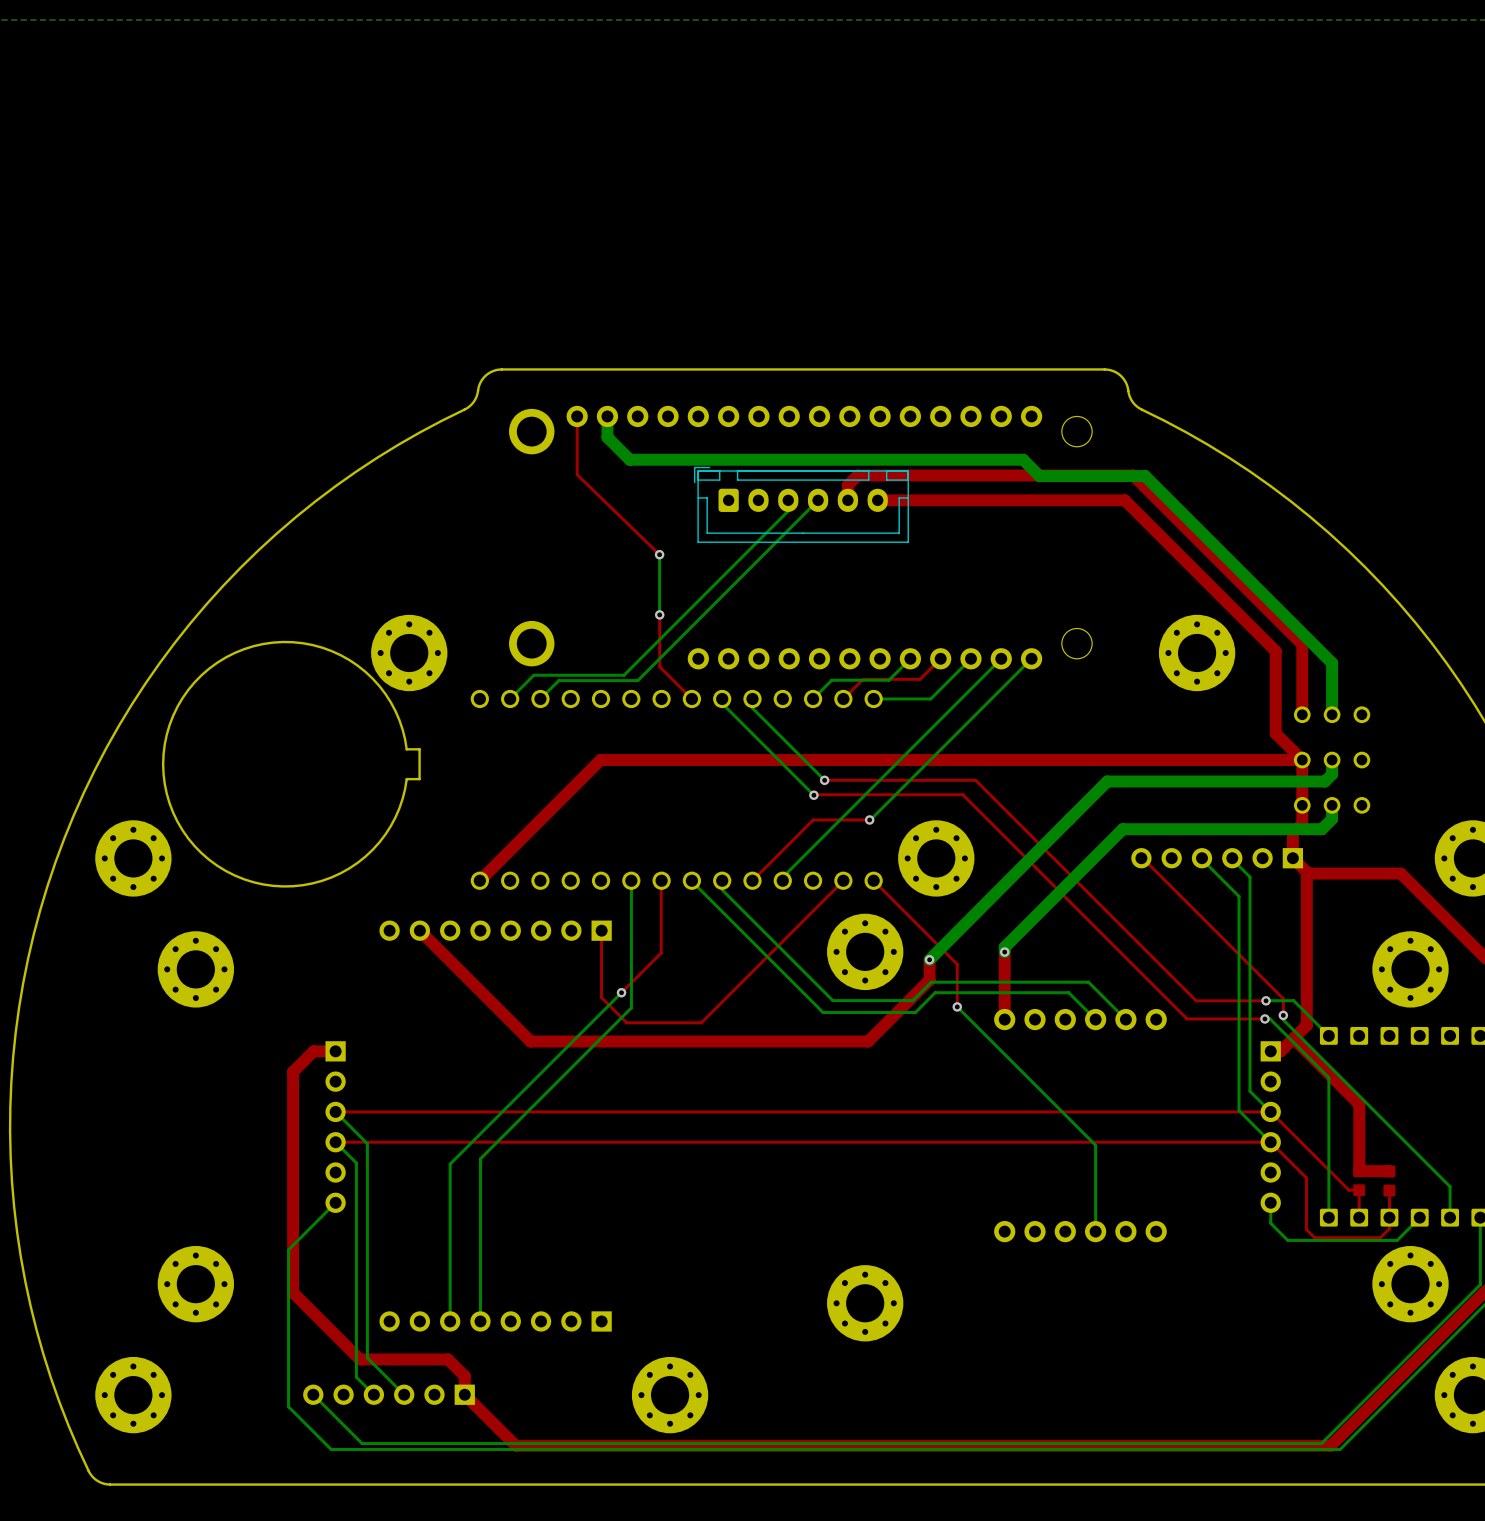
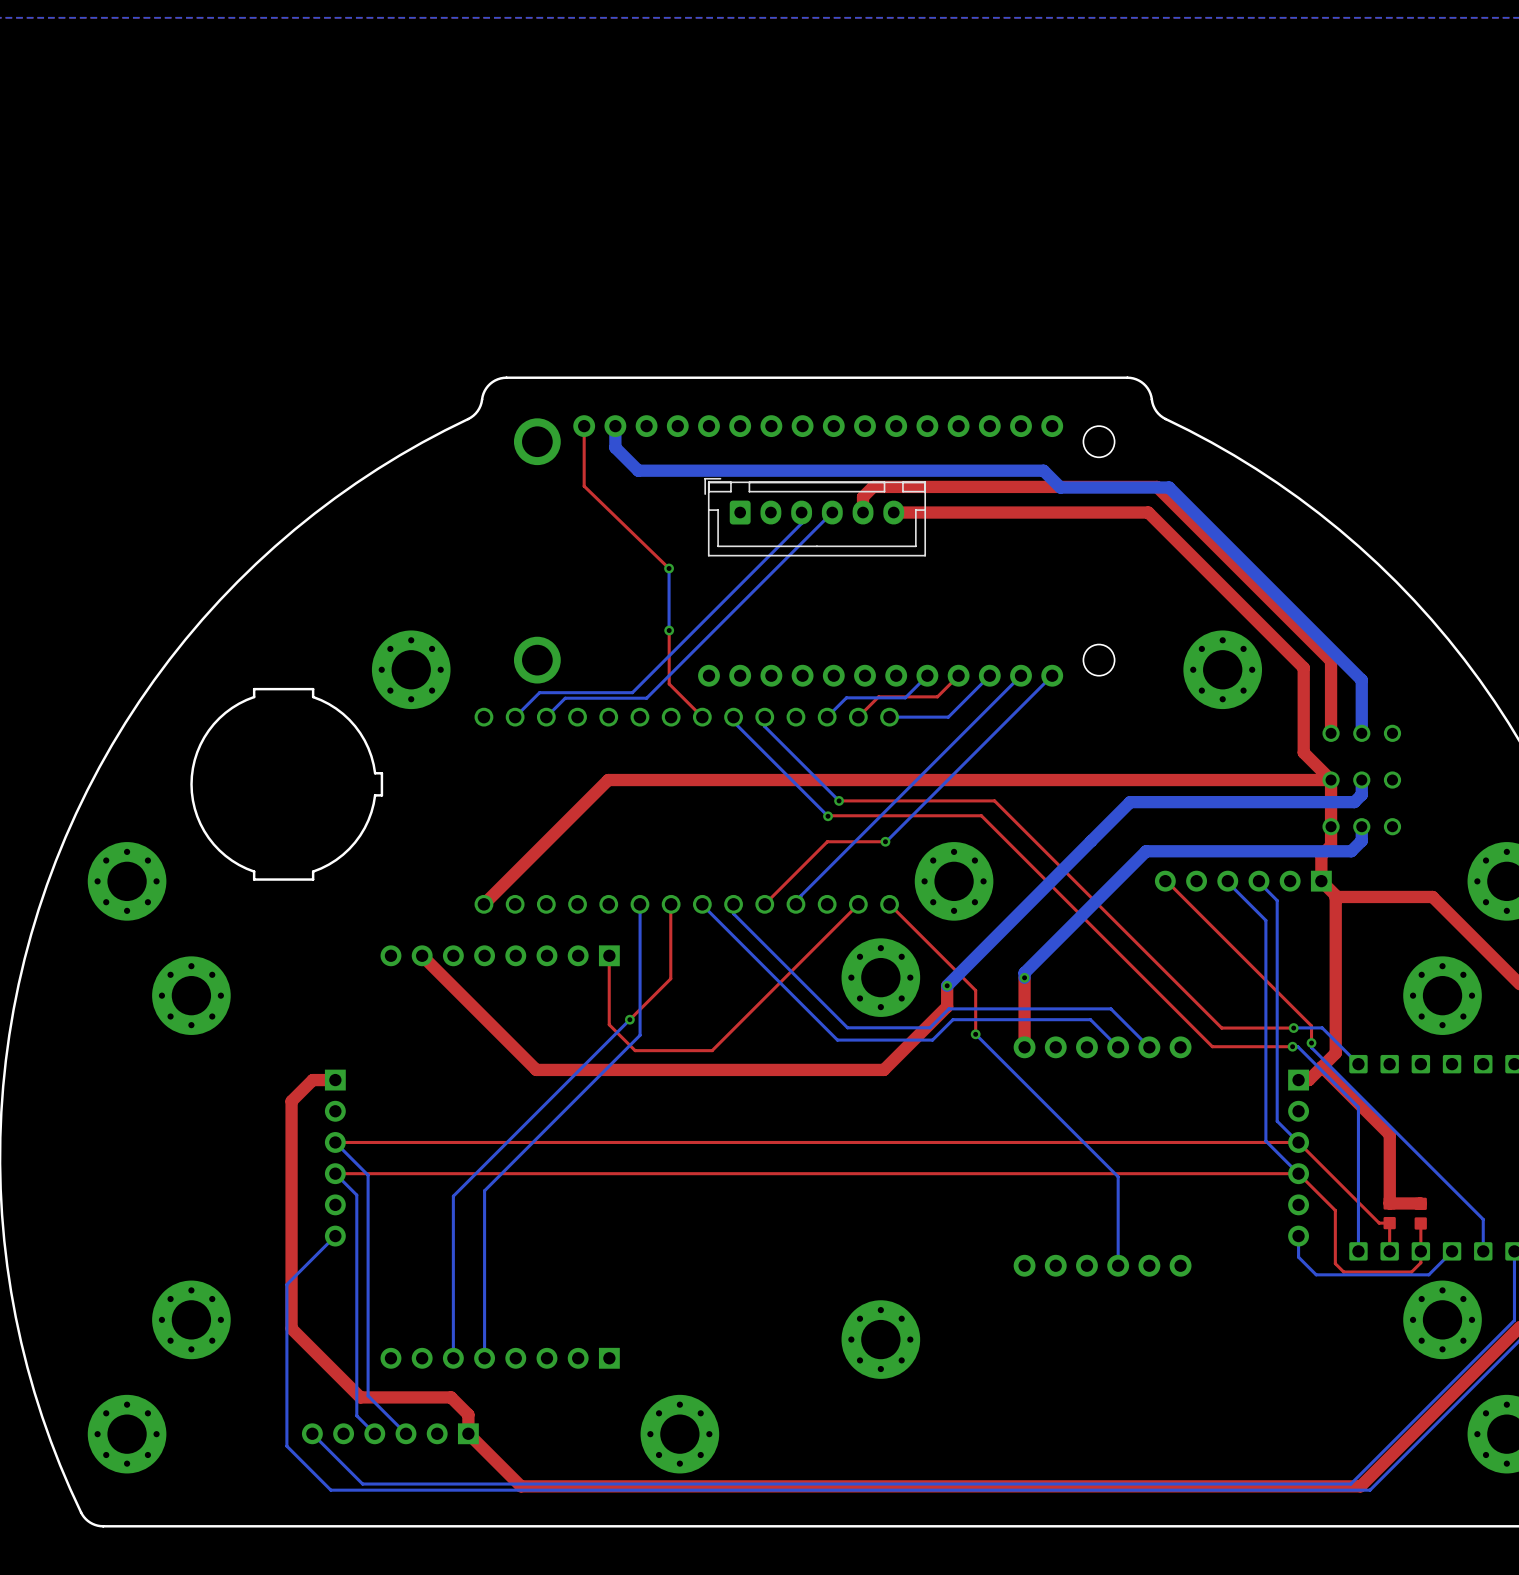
board edge: (419, 749) (406, 749) (399, 720) (390, 702) (372, 678) (357, 665) (340, 655) (322, 647) (302, 643) (272, 642) (253, 646) (225, 657) (201, 675) (188, 689) (173, 715) (166, 734) (163, 754) (163, 774) (169, 803) (177, 821) (194, 846) (209, 859) (225, 870) (243, 879) (263, 884) (292, 886) (312, 883) (331, 877) (357, 862) (372, 849) (385, 834) (395, 817) (402, 798) (406, 779) (419, 779) (419, 749) -> (313, 689) (313, 697) (328, 704) (343, 713) (360, 733) (371, 756) (375, 773) (381, 773) (381, 795) (375, 795) (368, 820) (355, 842) (336, 860) (313, 871) (313, 879) (254, 879) (254, 871) (225, 855) (213, 844) (200, 823) (191, 792) (194, 760) (204, 737) (213, 724) (232, 707) (254, 697) (254, 689) (313, 689)

